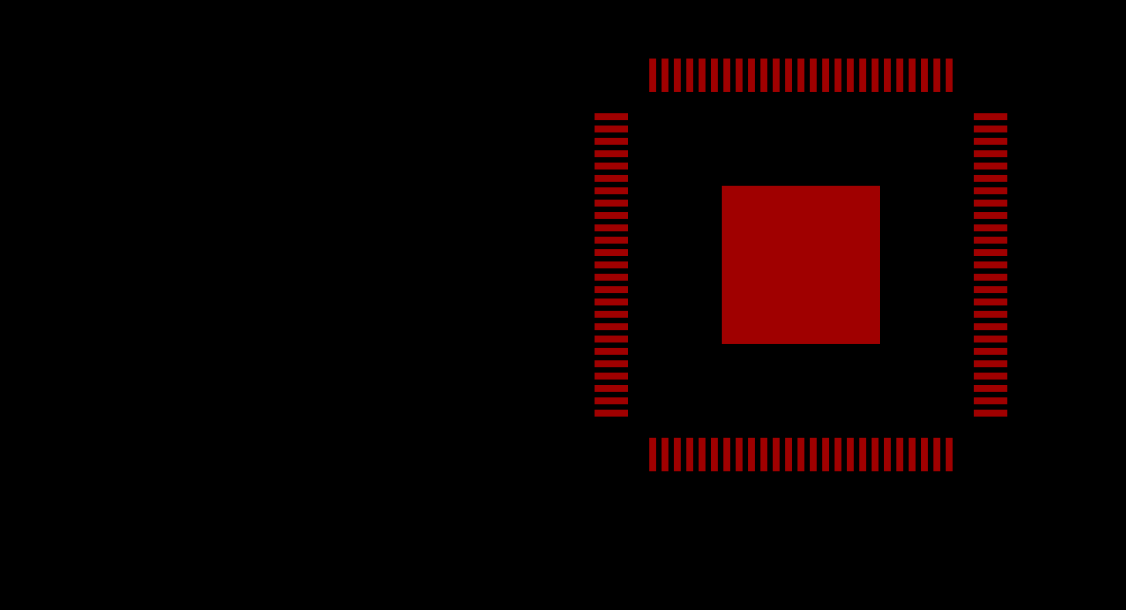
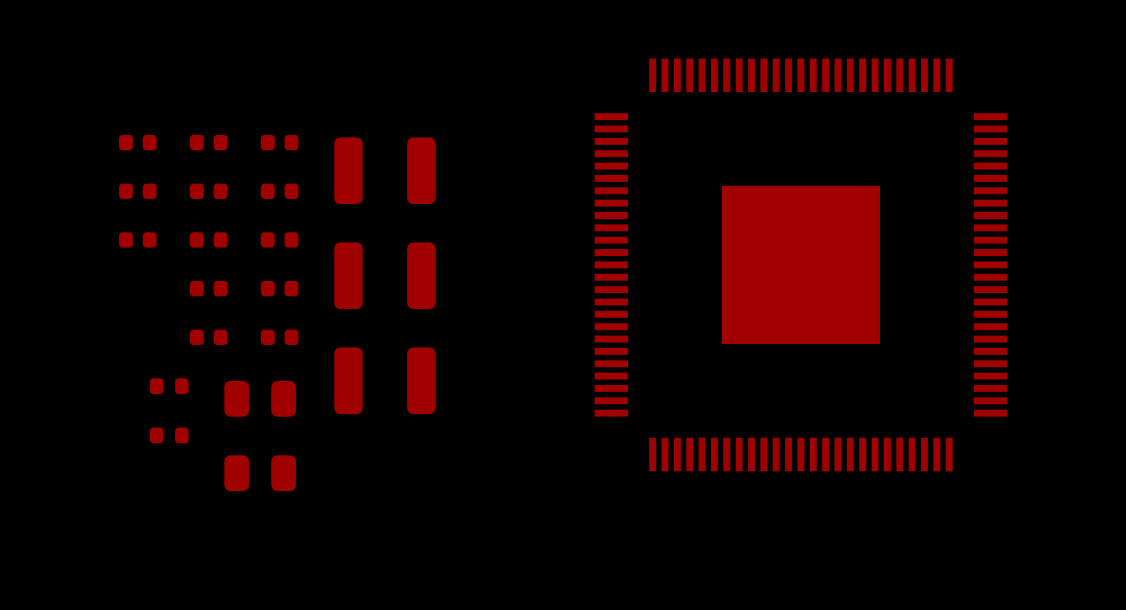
part: none -> (137, 142)
part: none -> (208, 142)
part: none -> (279, 142)
part: none -> (384, 170)
part: none -> (137, 191)
part: none -> (208, 191)
part: none -> (279, 191)
part: none -> (137, 239)
part: none -> (208, 239)
part: none -> (279, 239)
part: none -> (384, 275)
part: none -> (208, 288)
part: none -> (279, 288)
part: none -> (208, 337)
part: none -> (279, 337)
part: none -> (384, 380)
part: none -> (169, 386)
part: none -> (260, 398)
part: none -> (169, 435)
part: none -> (260, 473)

